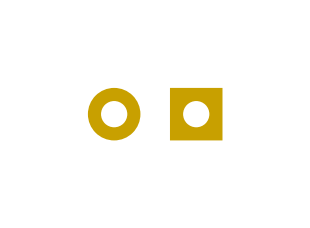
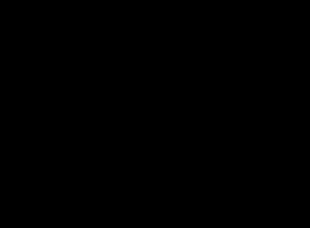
part: (155, 114) -> none

